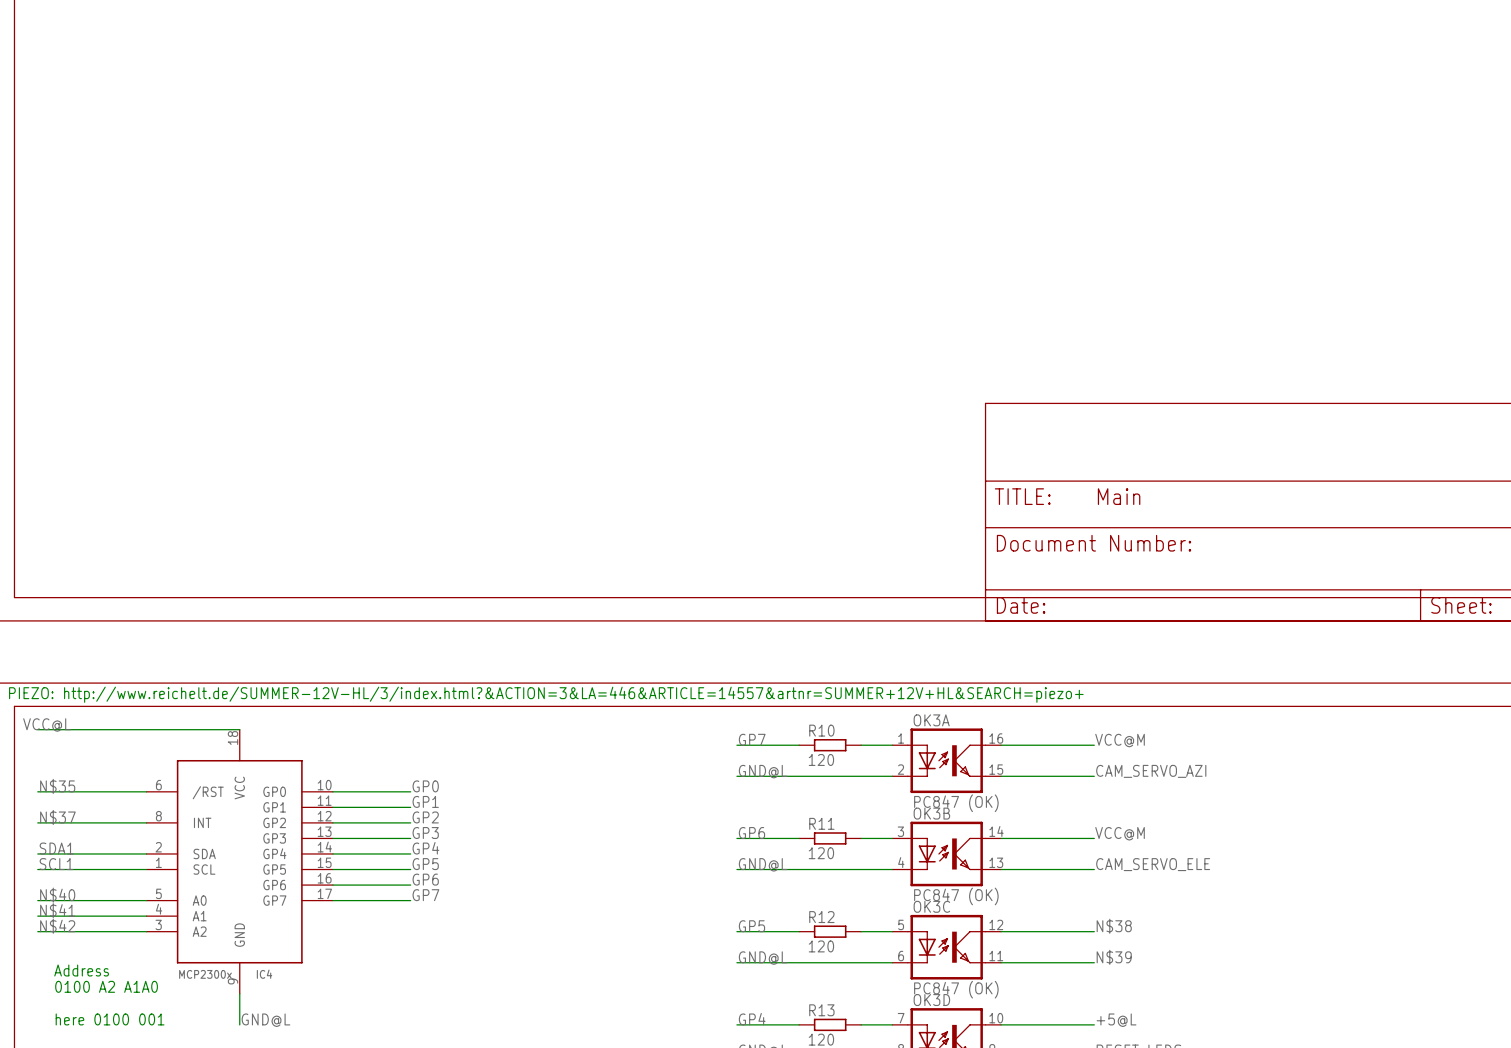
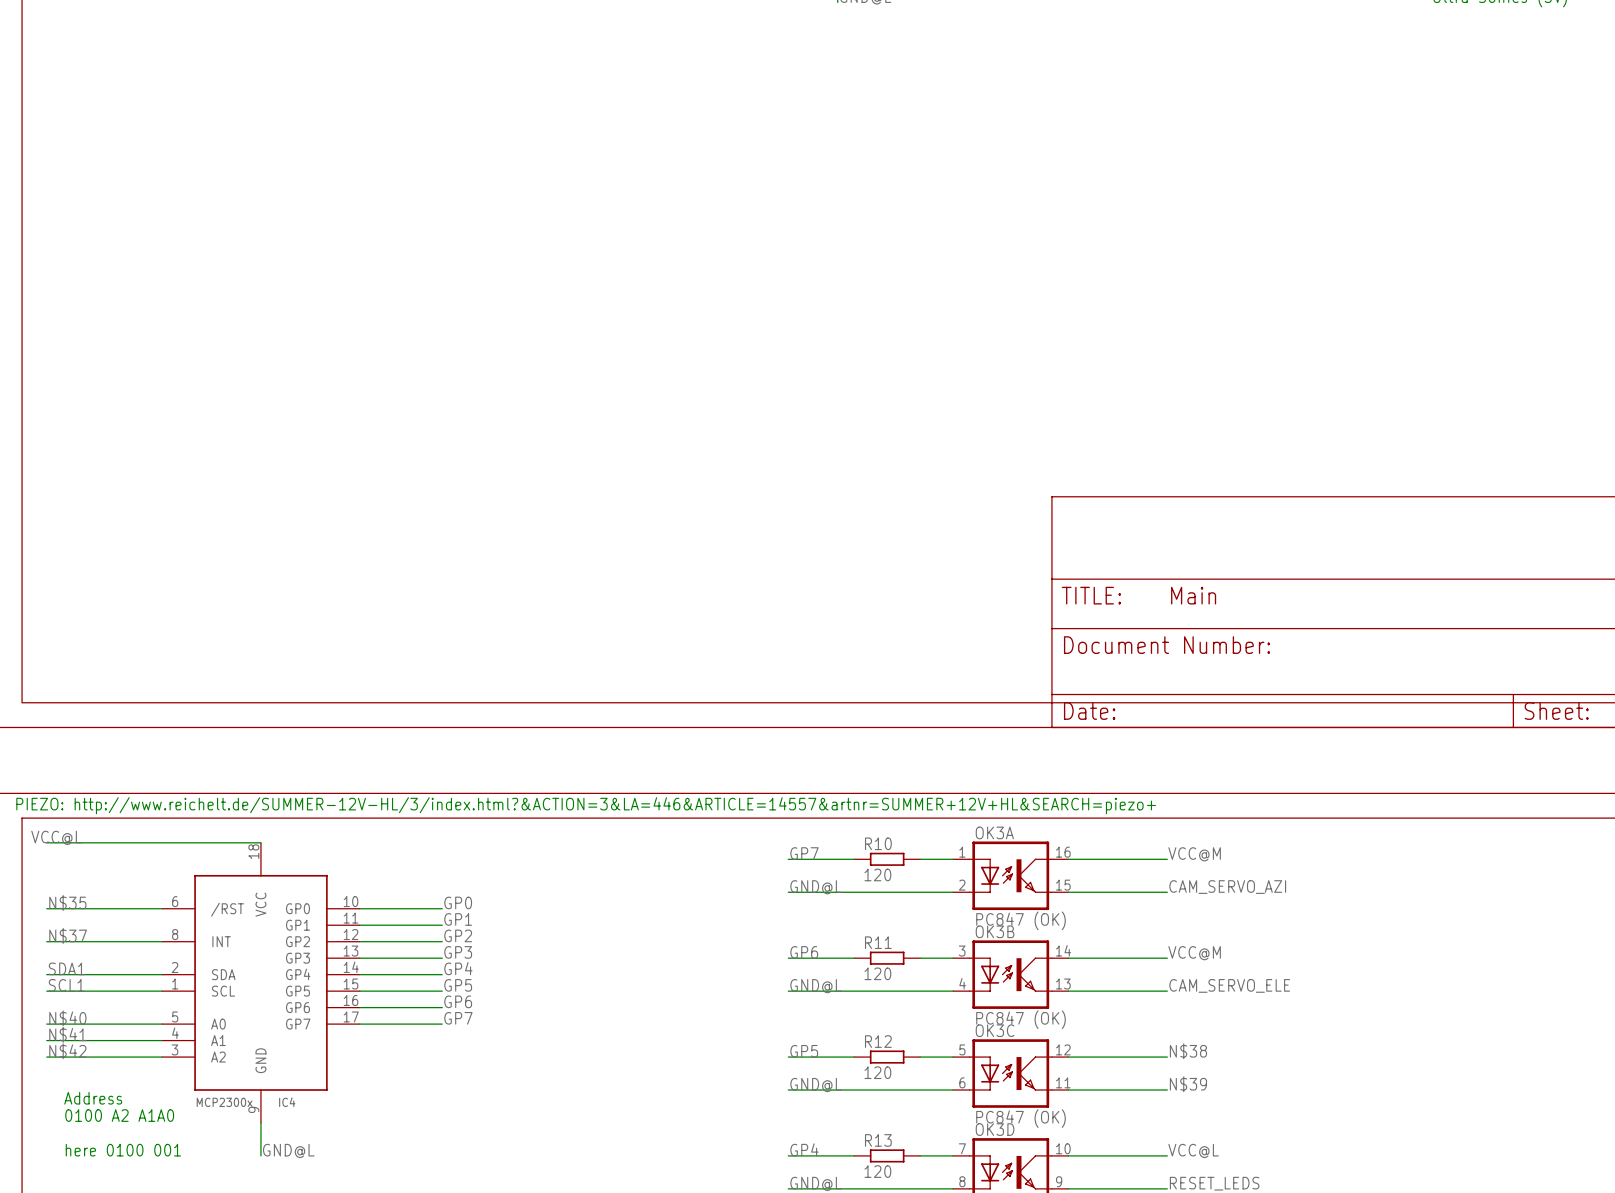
label: +5@L (1116, 1020) -> VCC@L (1193, 1150)

